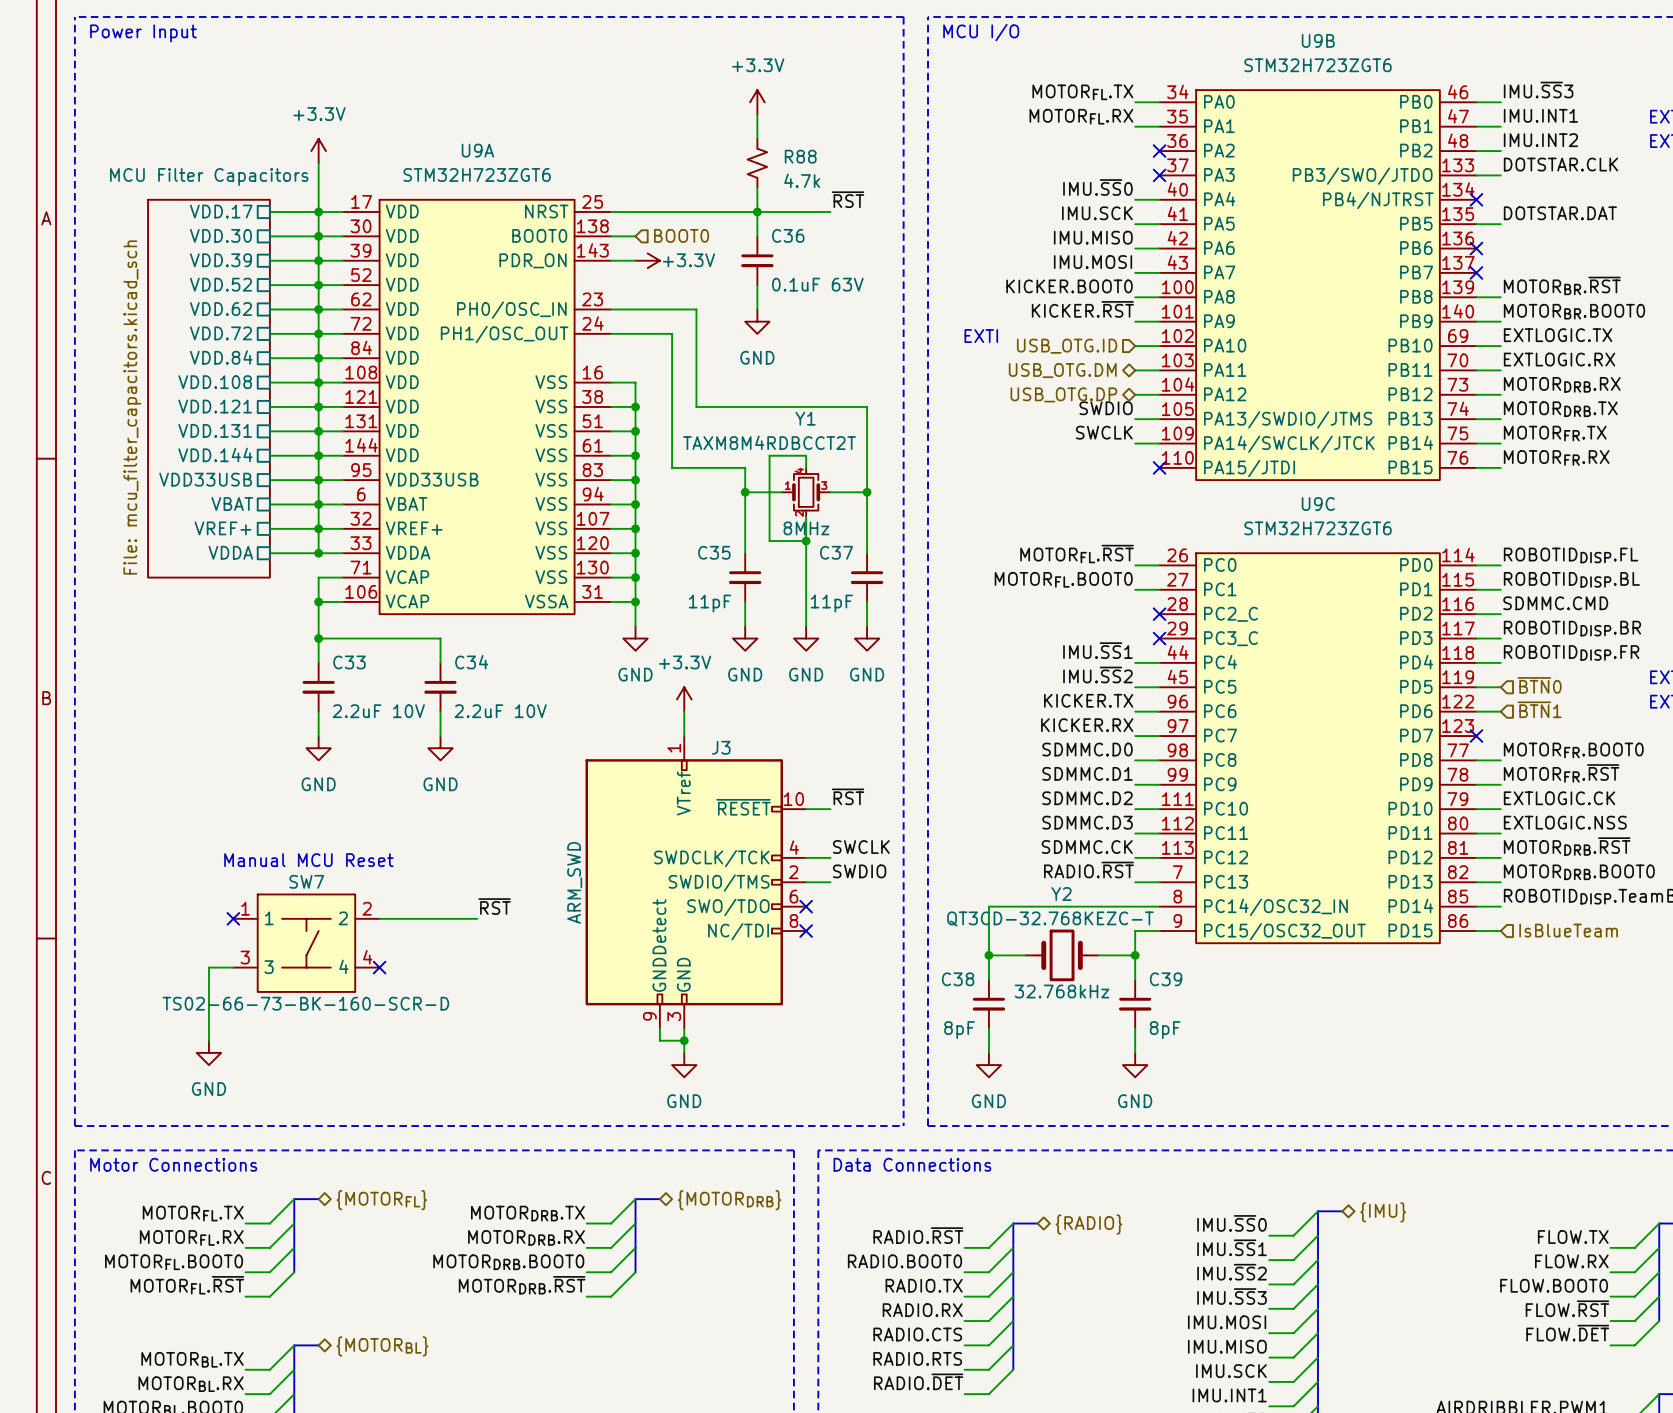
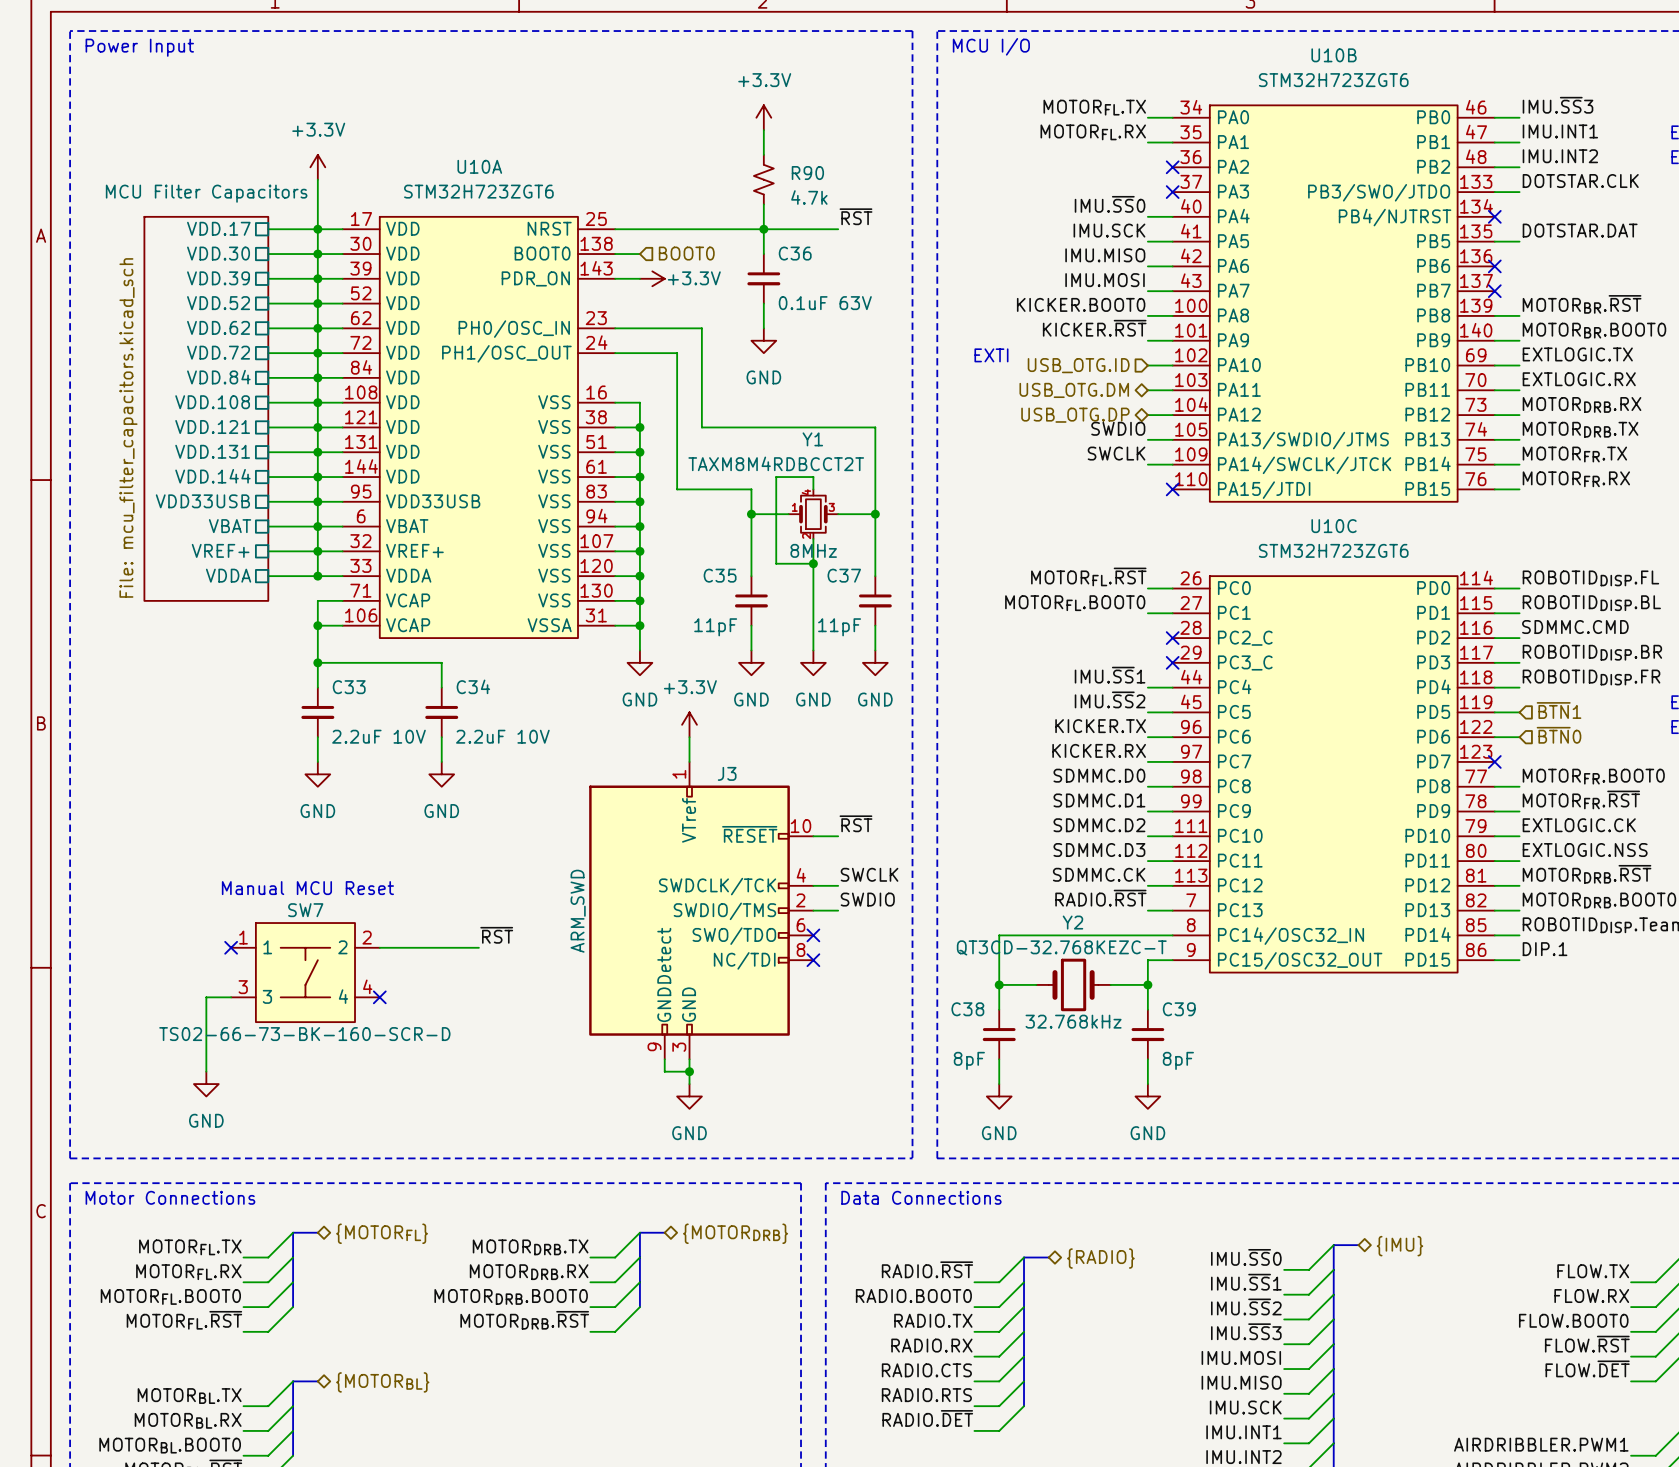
U9B name: U9B (1318, 40) -> U10B (1334, 55)
U9A name: U9A (477, 150) -> U10A (479, 166)
R88 name: R88 (800, 156) -> R90 (807, 173)
U9C name: U9C (1318, 504) -> U10C (1334, 526)
hierarchical label: ~{BTN}0 (1539, 685) -> ~{BTN}1 (1559, 710)
hierarchical label: ~{BTN}1 (1539, 709) -> ~{BTN}0 (1559, 735)
label: none -> DIP.1 (1545, 949)
hierarchical label: IsBlueTeam (1568, 930) -> none

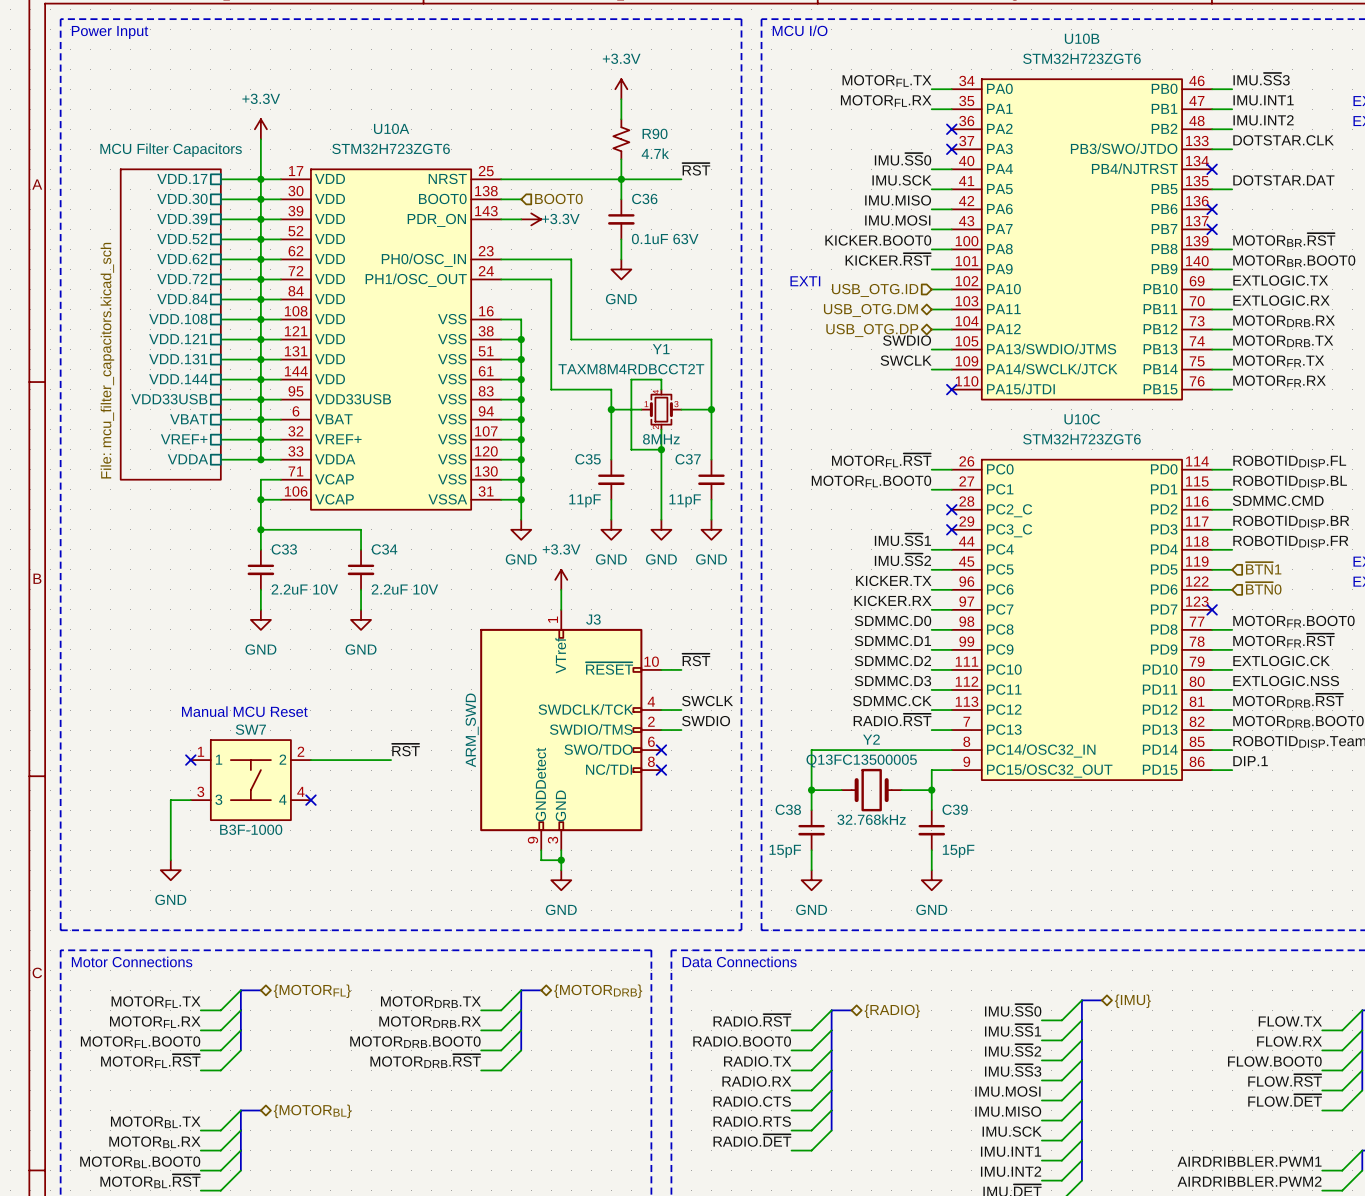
Y2 value: QT3CD-32.768KEZC-T (1061, 947) -> Q13FC13500005 (861, 760)
SW7 value: TS02-66-73-BK-160-SCR-D (304, 1034) -> B3F-1000 (251, 829)
C38 value: 8pF (969, 1060) -> 15pF (785, 851)
C39 value: 8pF (1178, 1060) -> 15pF (958, 851)

